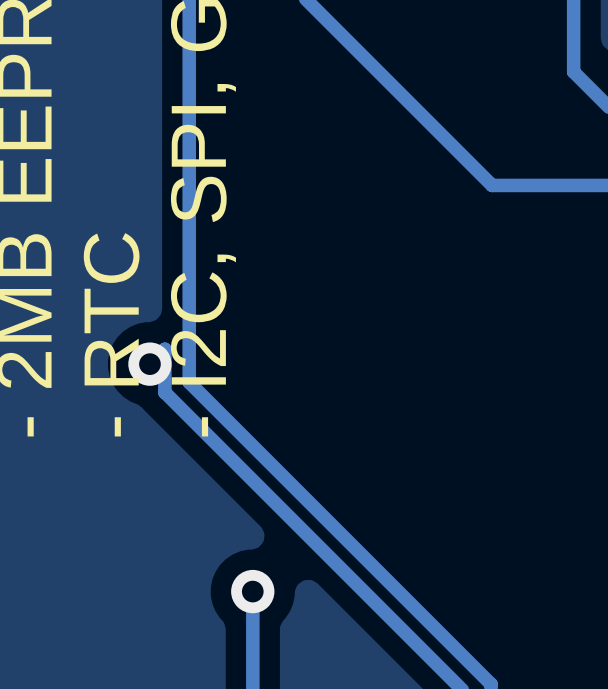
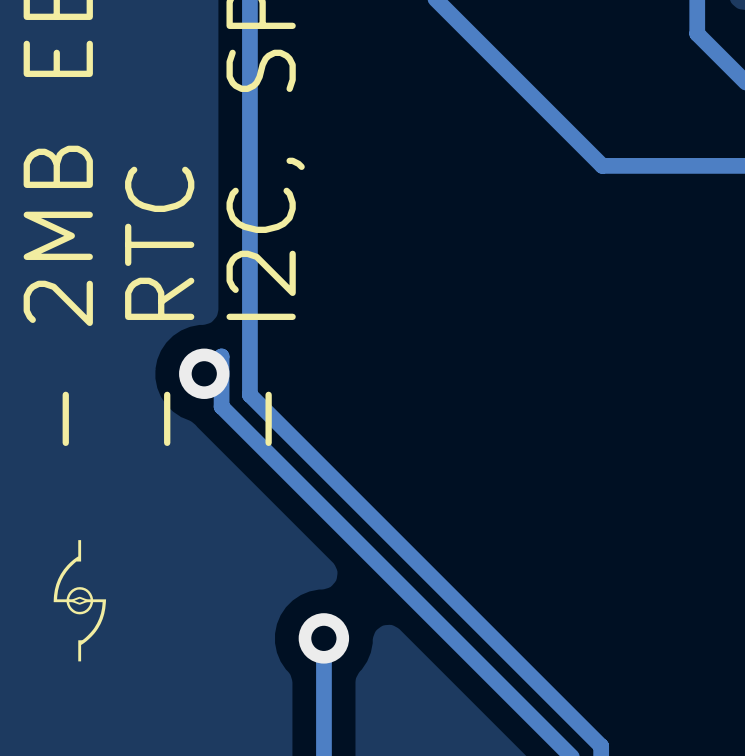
drawing: none -> [53, 540, 107, 662]

